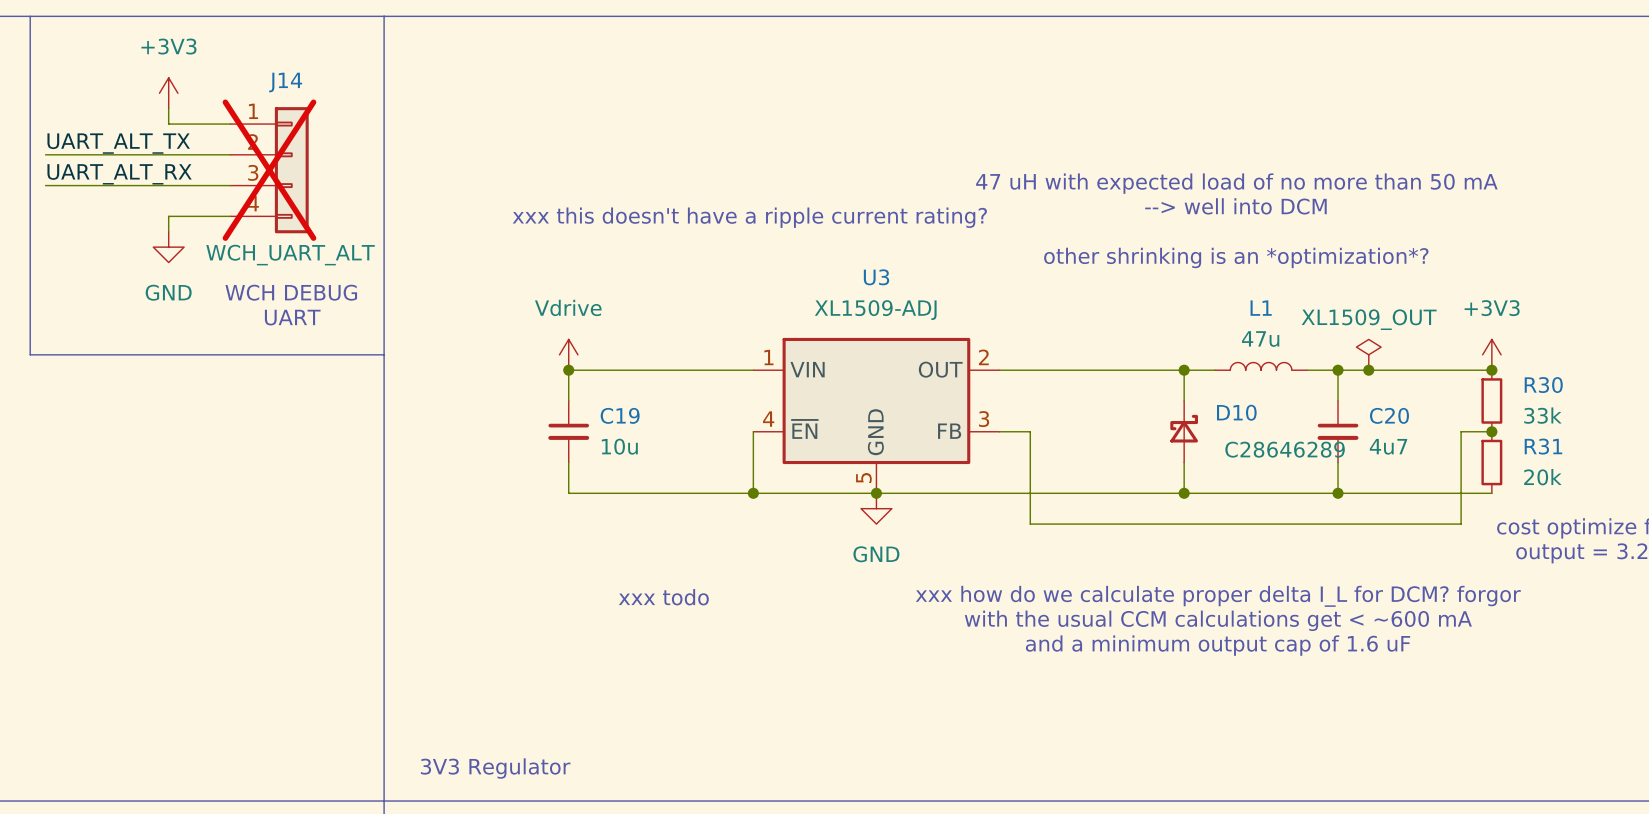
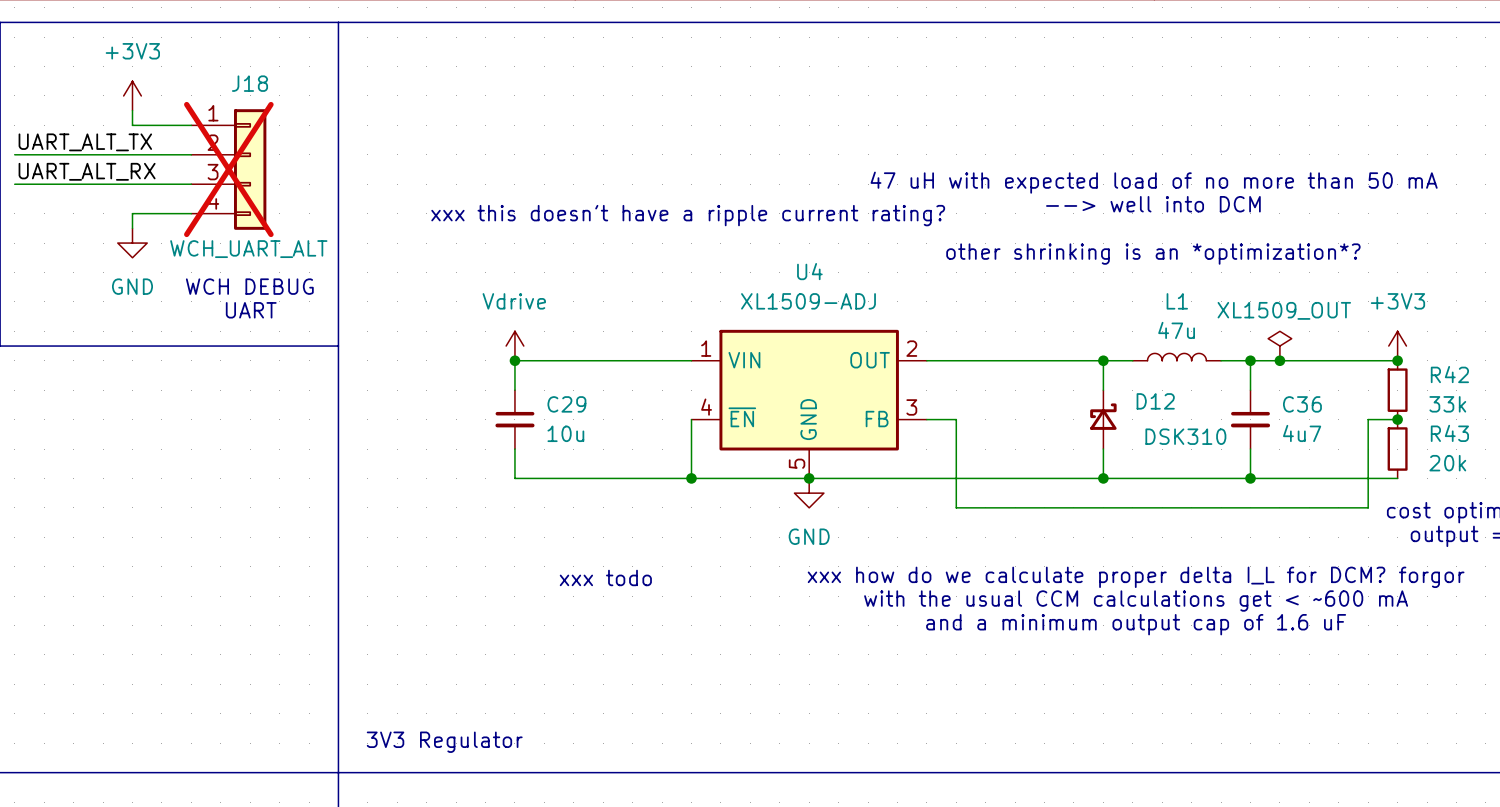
J14 name: J14 (285, 82) -> J18 (250, 83)
U3 name: U3 (876, 277) -> U4 (809, 271)
R30 name: R30 (1543, 385) -> R42 (1449, 374)
D10 name: D10 (1236, 412) -> D12 (1155, 401)
C19 name: C19 (620, 415) -> C29 (566, 404)
C20 name: C20 (1389, 415) -> C36 (1302, 404)
R31 name: R31 (1543, 446) -> R43 (1449, 433)
D10 value: C28646289 (1285, 449) -> DSK310 (1185, 436)

